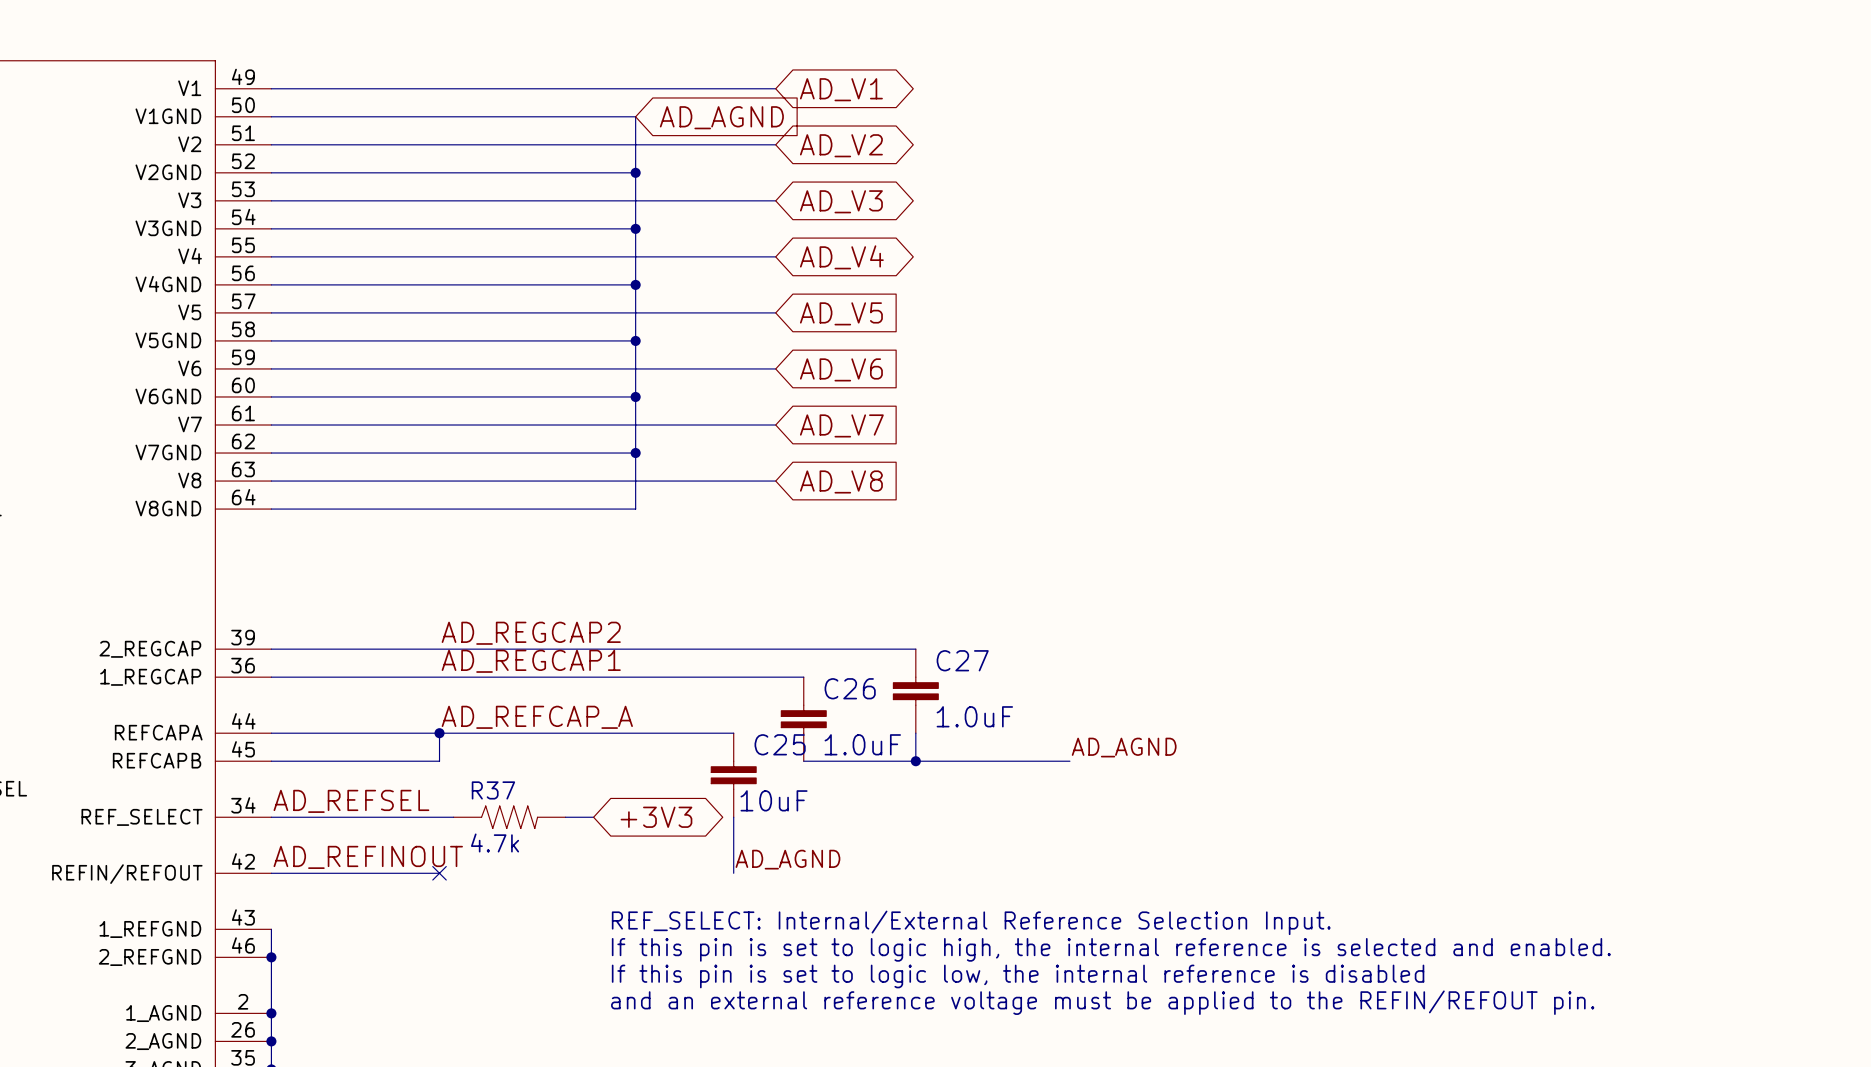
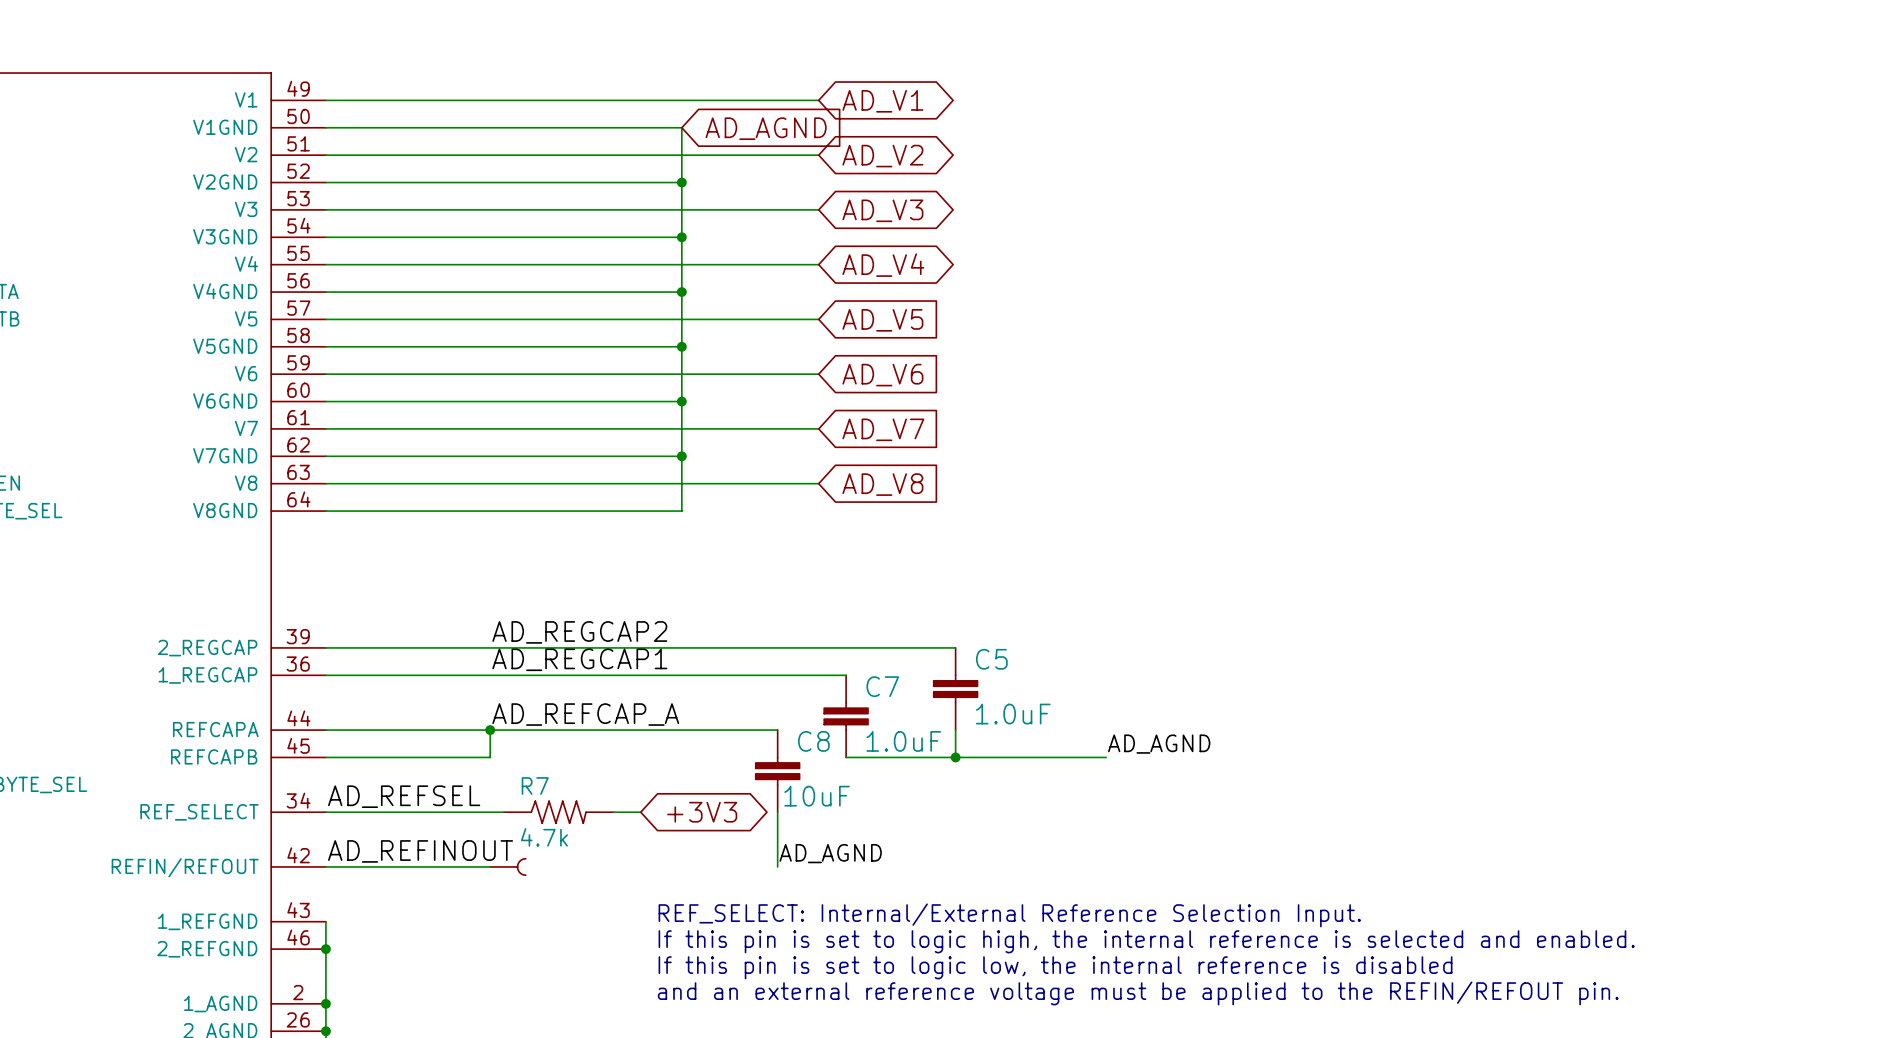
C27 name: C27 (962, 660) -> C5 (991, 659)
C26 name: C26 (850, 688) -> C7 (882, 686)
C25 name: C25 (780, 744) -> C8 (813, 741)
R37 name: R37 (493, 790) -> R7 (535, 786)
no-connect mark: (439, 873) -> none
part: none -> (508, 866)

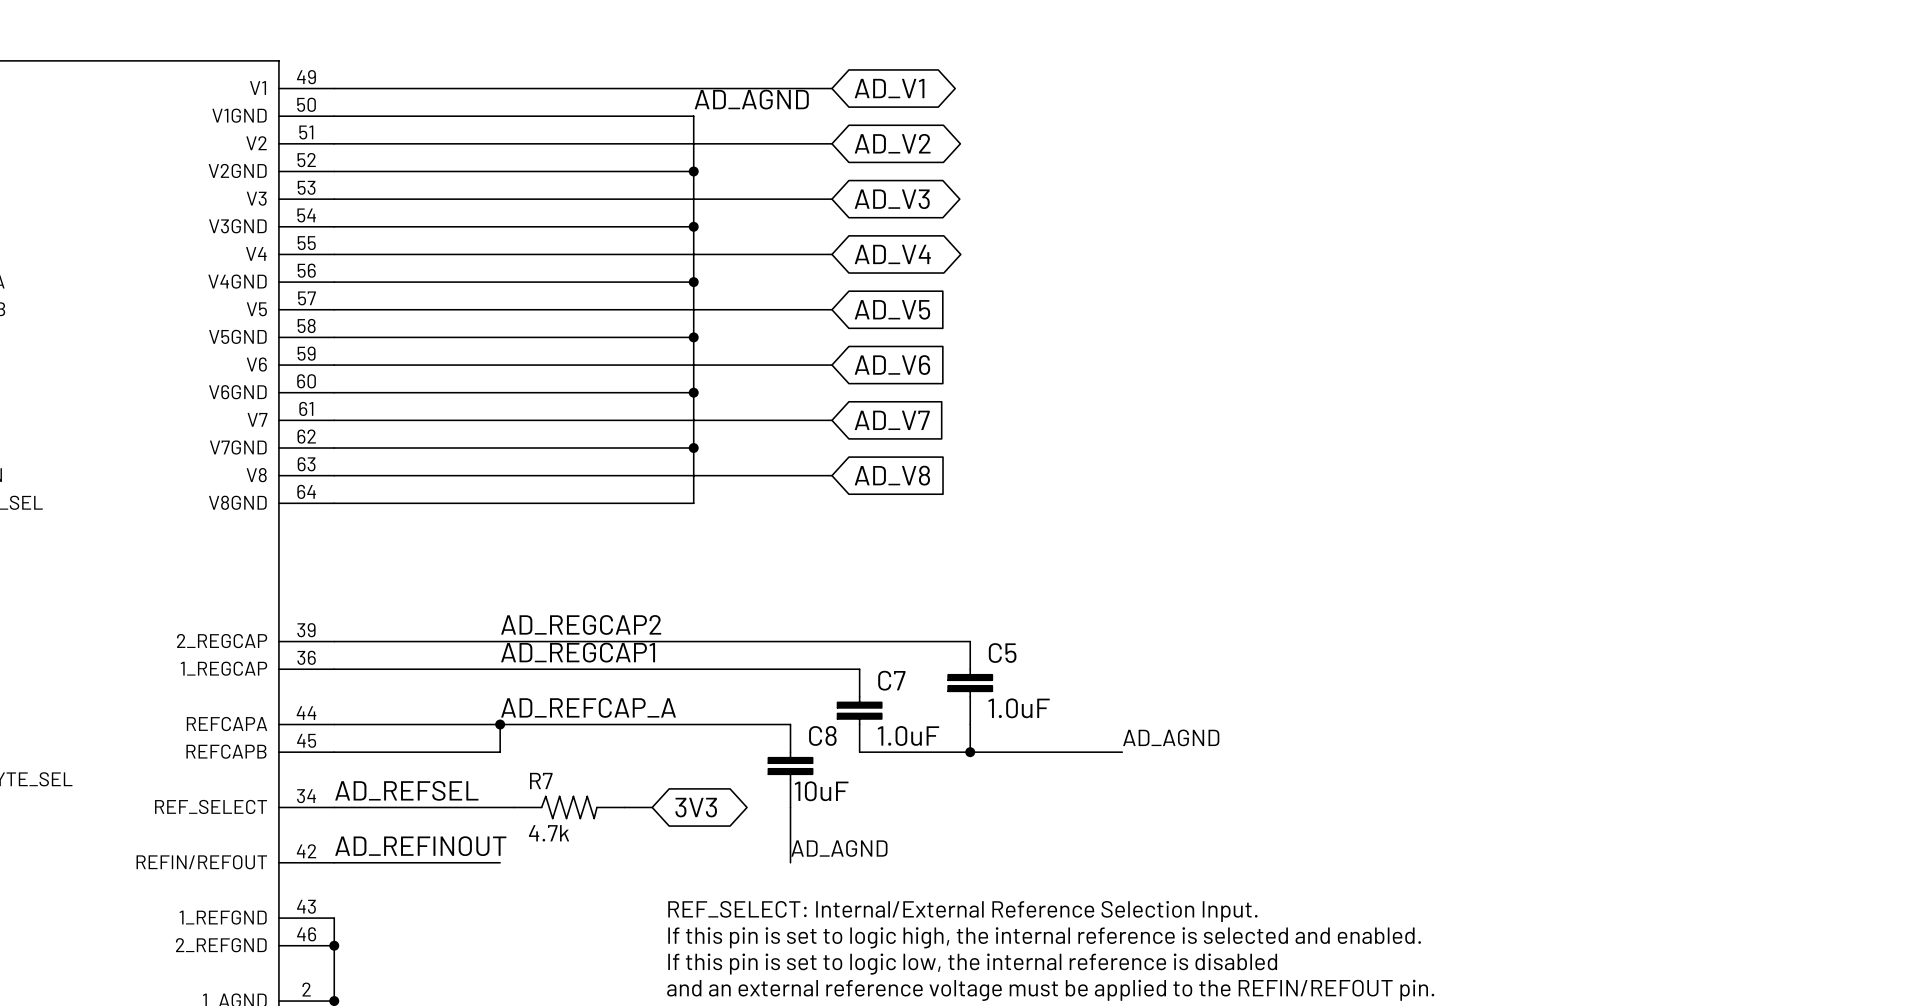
label: none -> AD_AGND (751, 99)
global label: AD_AGND (766, 128) -> none
global label: +3V3 (702, 812) -> 3V3 (696, 807)
part: (508, 866) -> none

